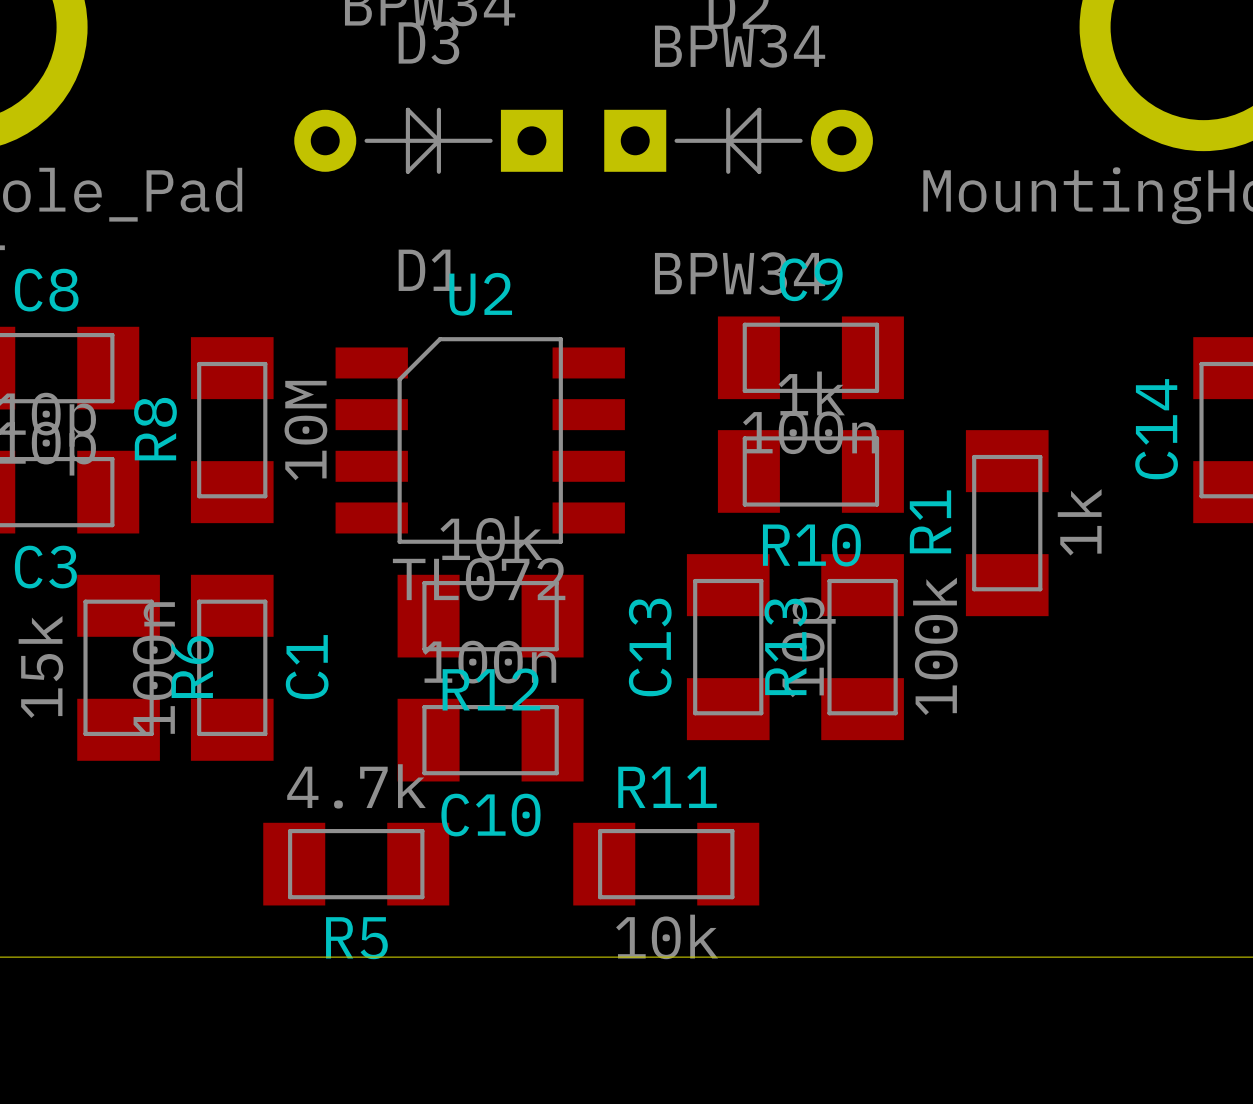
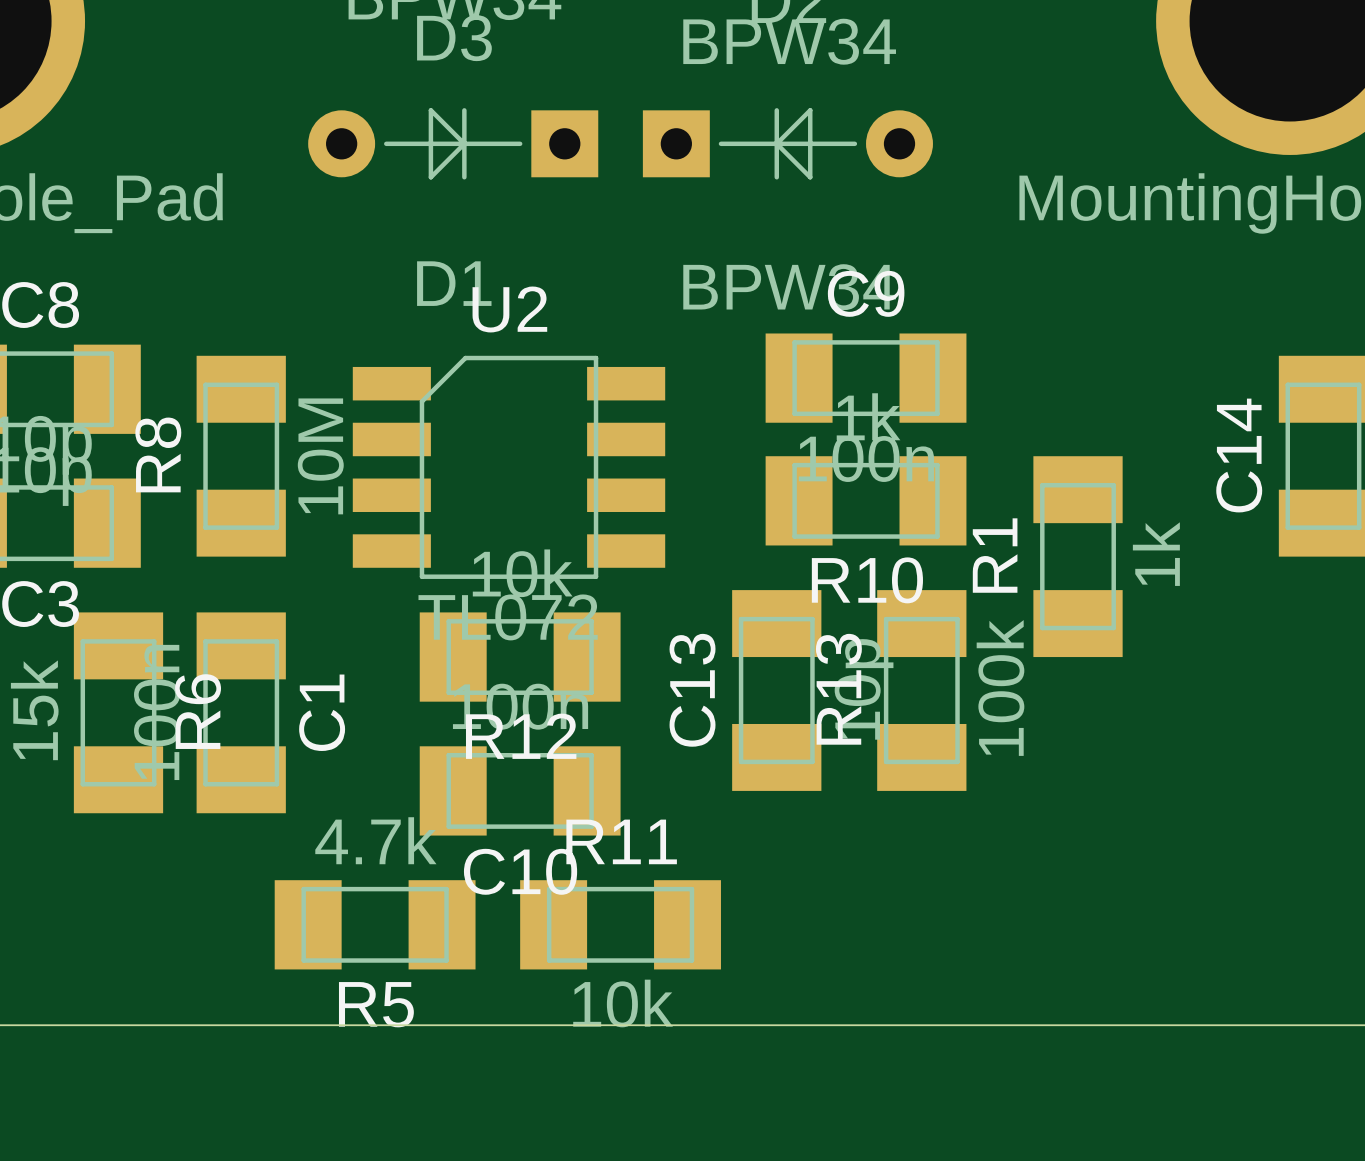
R11 position: (666, 864) -> (620, 924)

